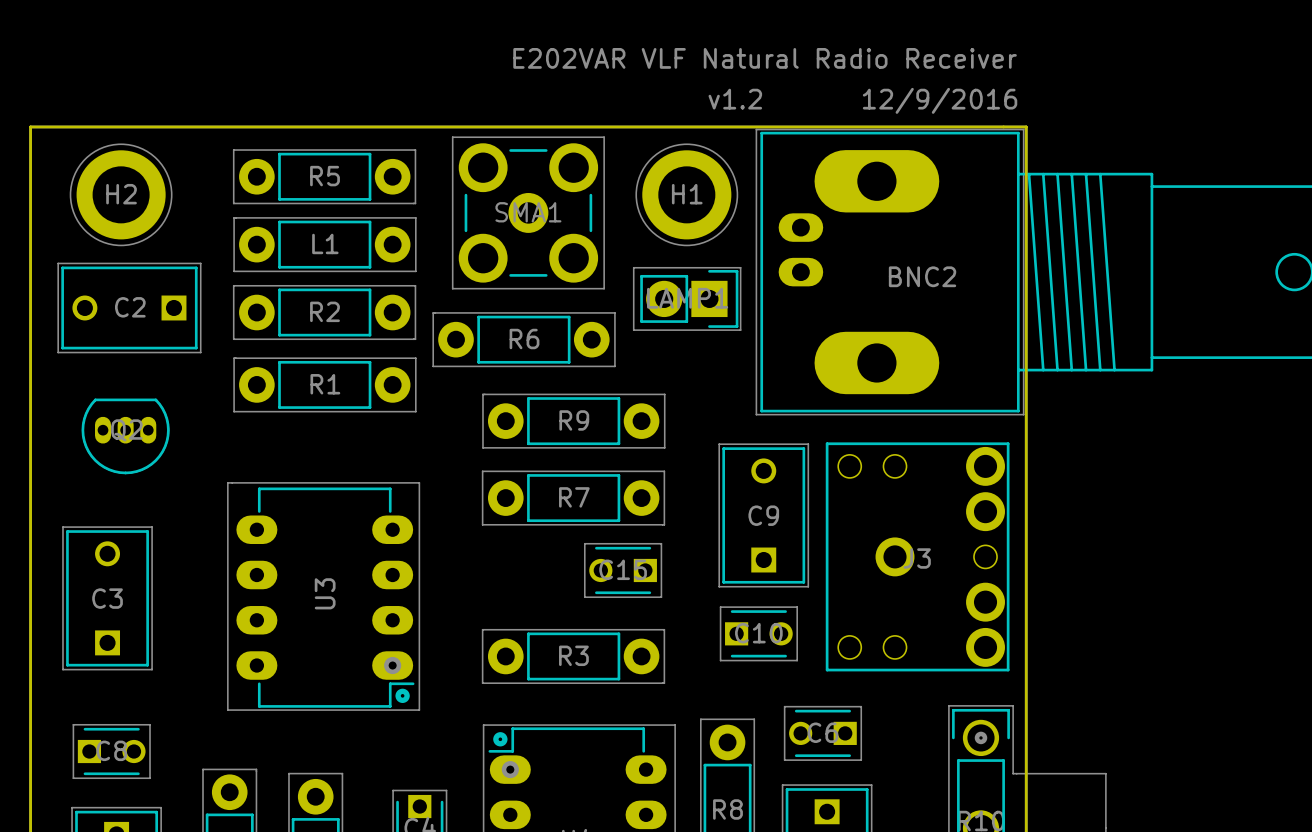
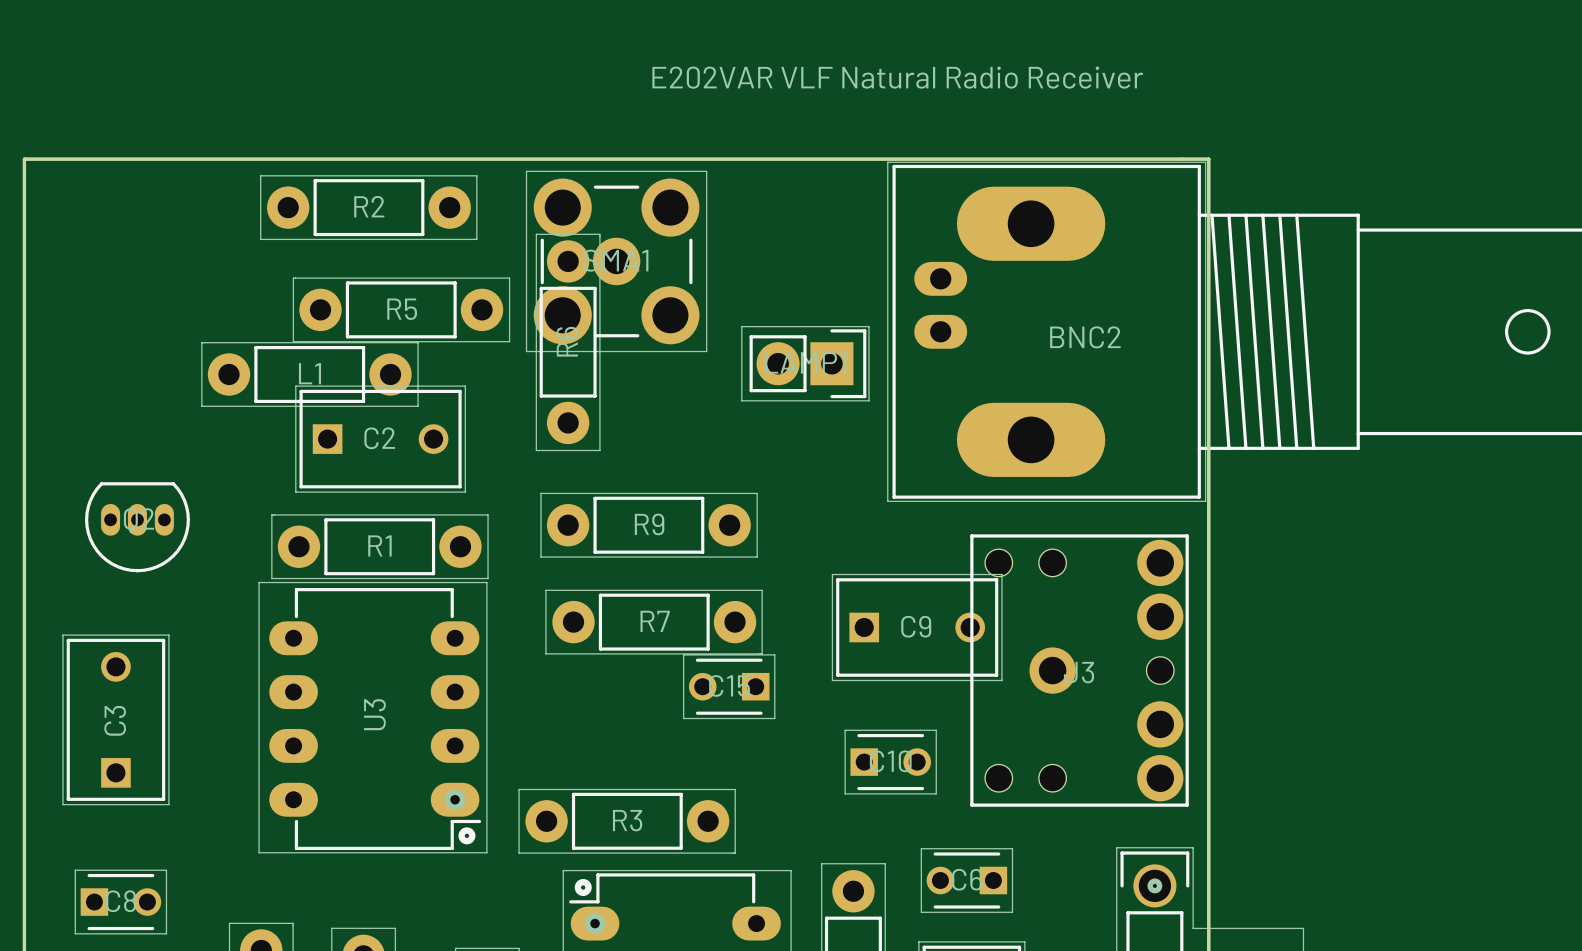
text: v1.2 12/9/2016 (862, 100) -> none
R5 rotation: 0° (324, 176) -> 180° (401, 309)
H2: (121, 194) -> none
H1: (686, 194) -> none
L1 position: (324, 244) -> (309, 374)
C2 rotation: 0° (129, 307) -> 180° (380, 439)
C2 position: (129, 307) -> (380, 439)
R2 position: (324, 312) -> (368, 207)
R6 rotation: 0° (524, 339) -> 90° clockwise (568, 342)
R1 position: (324, 384) -> (379, 546)
R9 position: (573, 421) -> (649, 525)
R7 position: (573, 498) -> (654, 622)
C9 rotation: 0° (763, 515) -> 90° clockwise (917, 627)
C3 name rotation: 0° (107, 598) -> 90° counterclockwise (115, 720)
R3 position: (573, 656) -> (627, 821)

